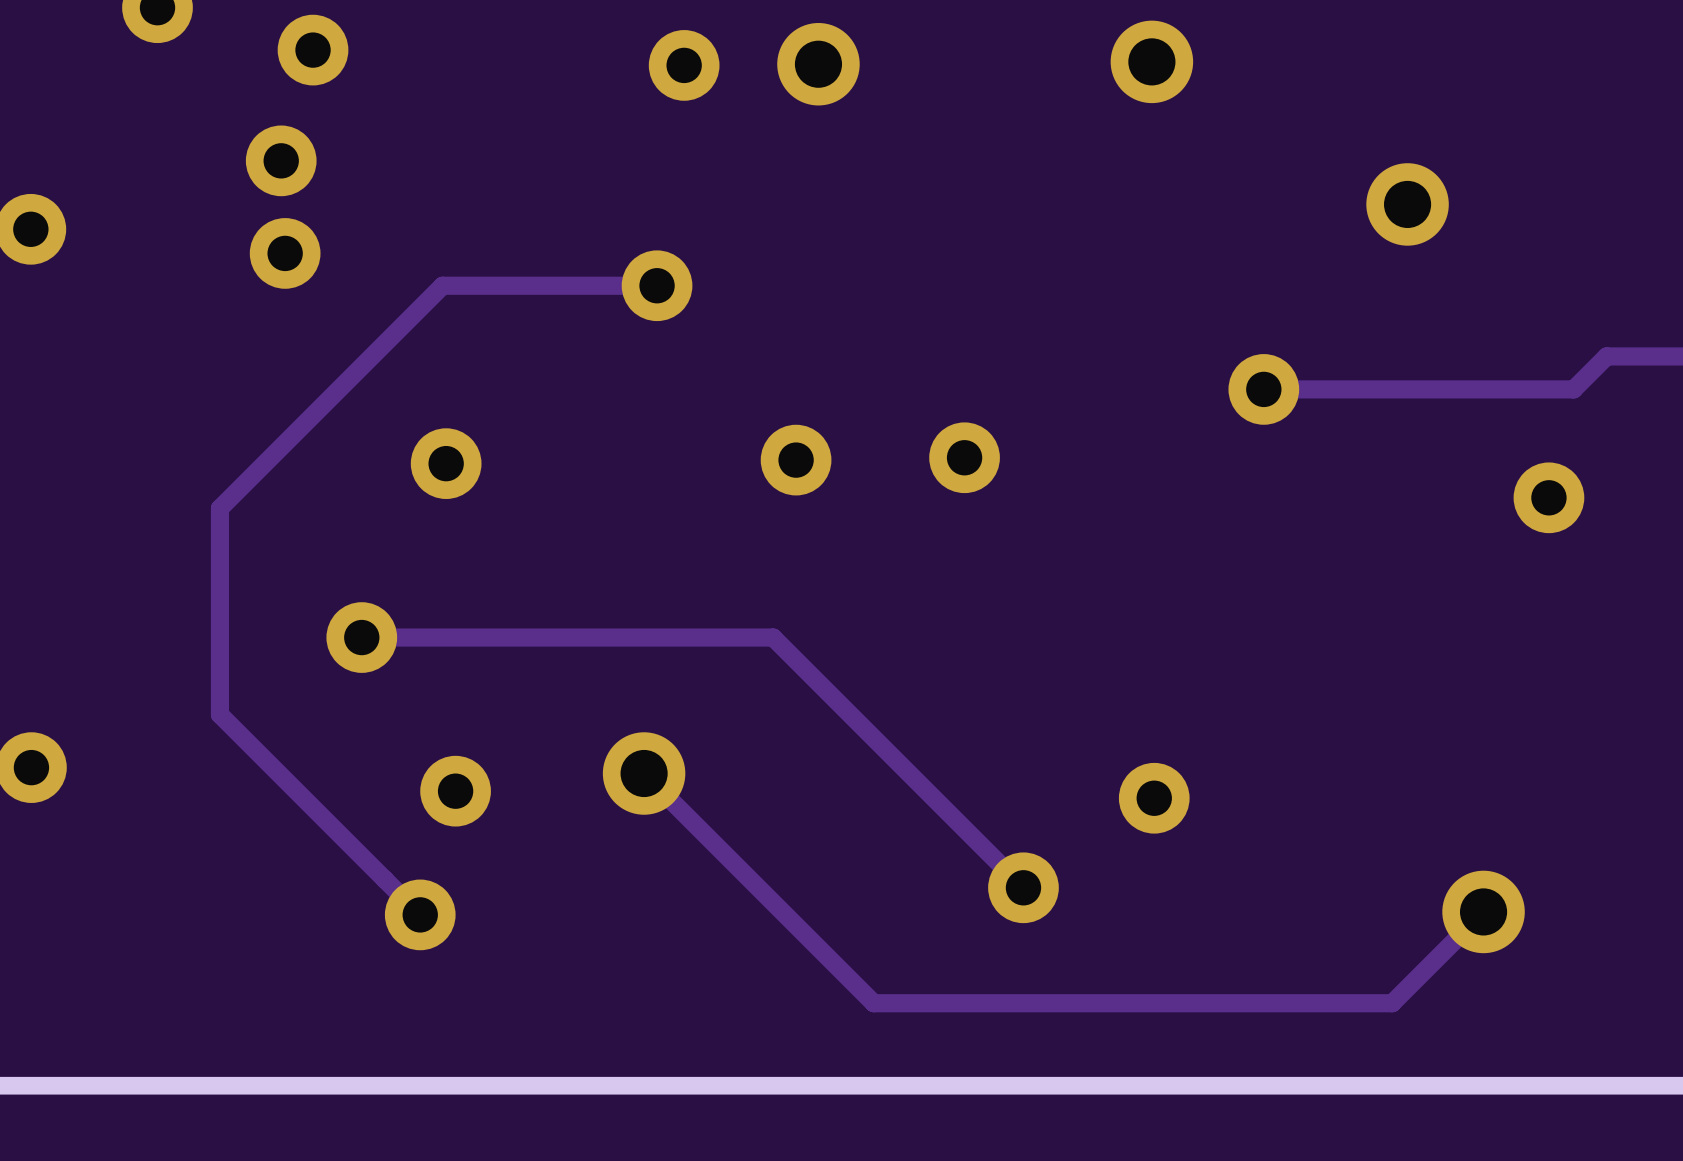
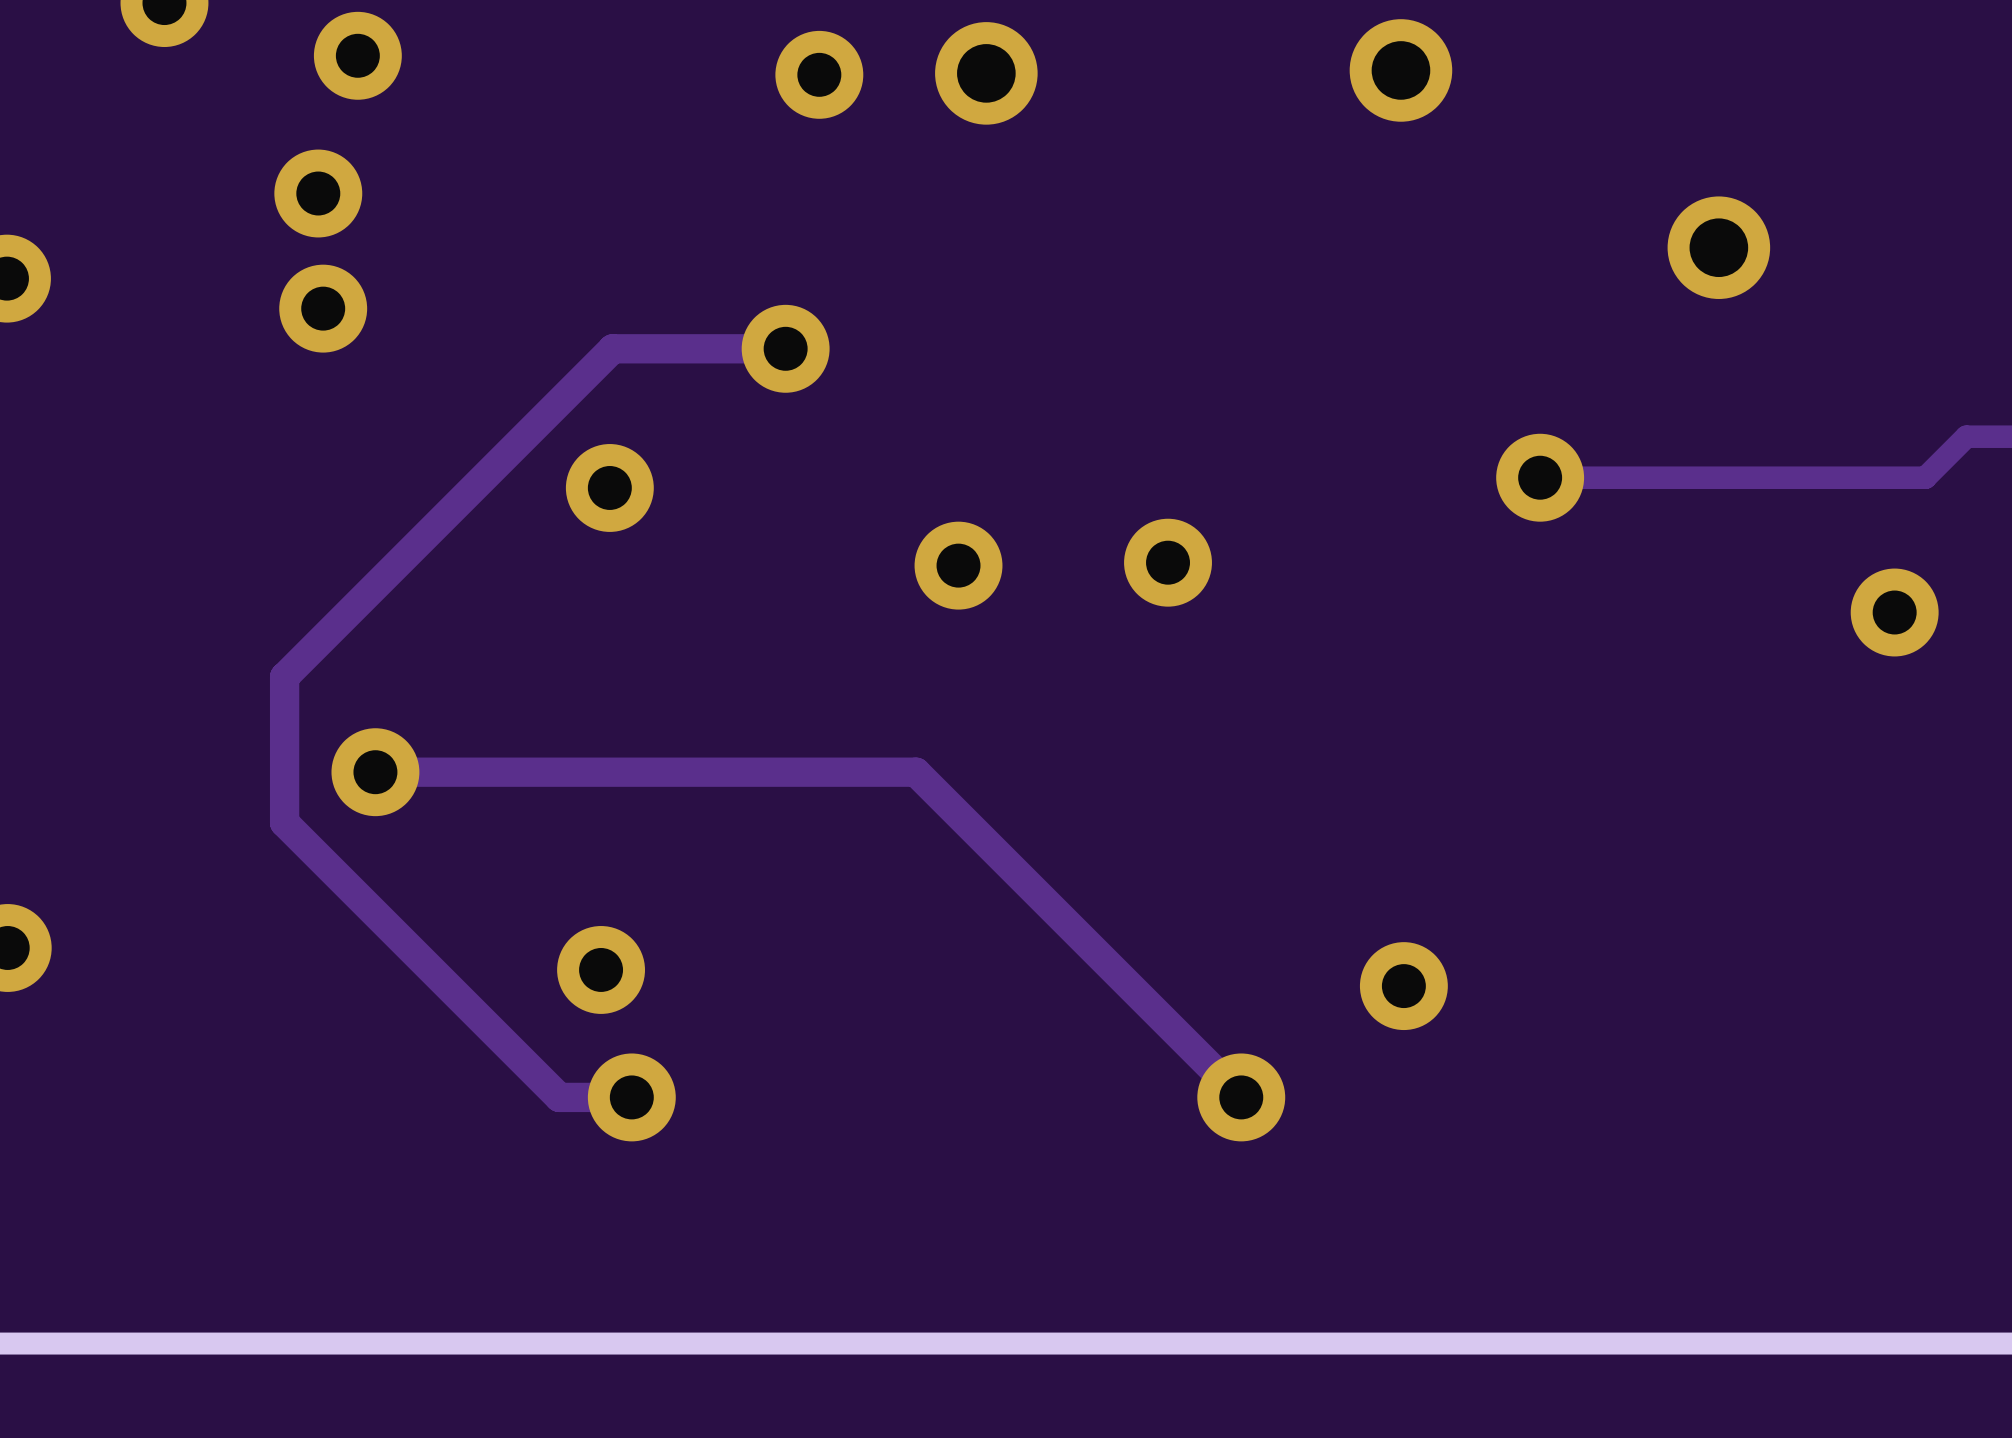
track: (518, 285) (442, 285) (219, 508) (219, 714) (420, 914) -> (612, 348) (284, 676) (284, 822) (559, 1097) (631, 1097)
track width: thin (657, 285) (518, 285) -> thick (785, 348) (612, 348)
via position: (446, 463) -> (609, 487)
via position: (361, 637) -> (375, 772)
track: (773, 637) (361, 637) -> (930, 786) (916, 772) (375, 772)
track width: thin (773, 637) (1023, 887) -> thick (930, 786) (1241, 1097)
track: (644, 773) (873, 1003) (1392, 1003) (1492, 903) -> none
via: (644, 773) -> none
via position: (455, 791) -> (601, 969)
via: none -> (631, 1097)
via: (1483, 911) -> none
via: (420, 914) -> none

